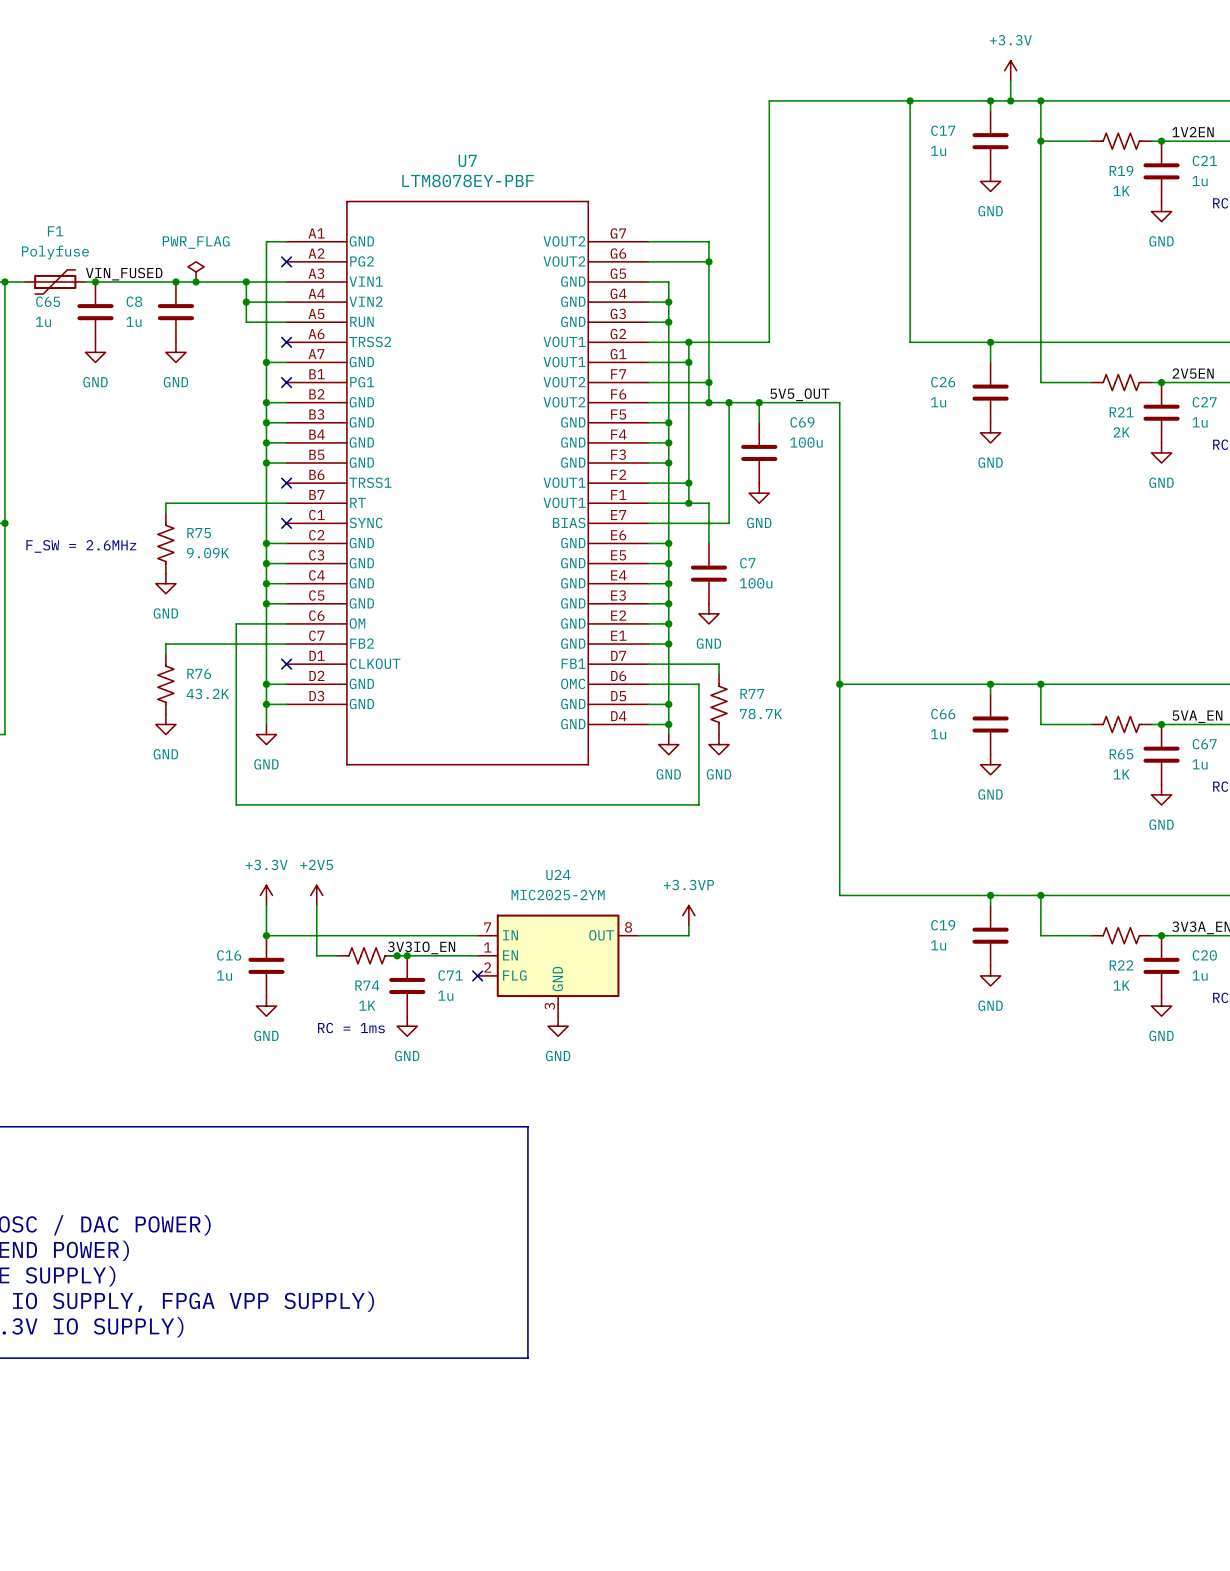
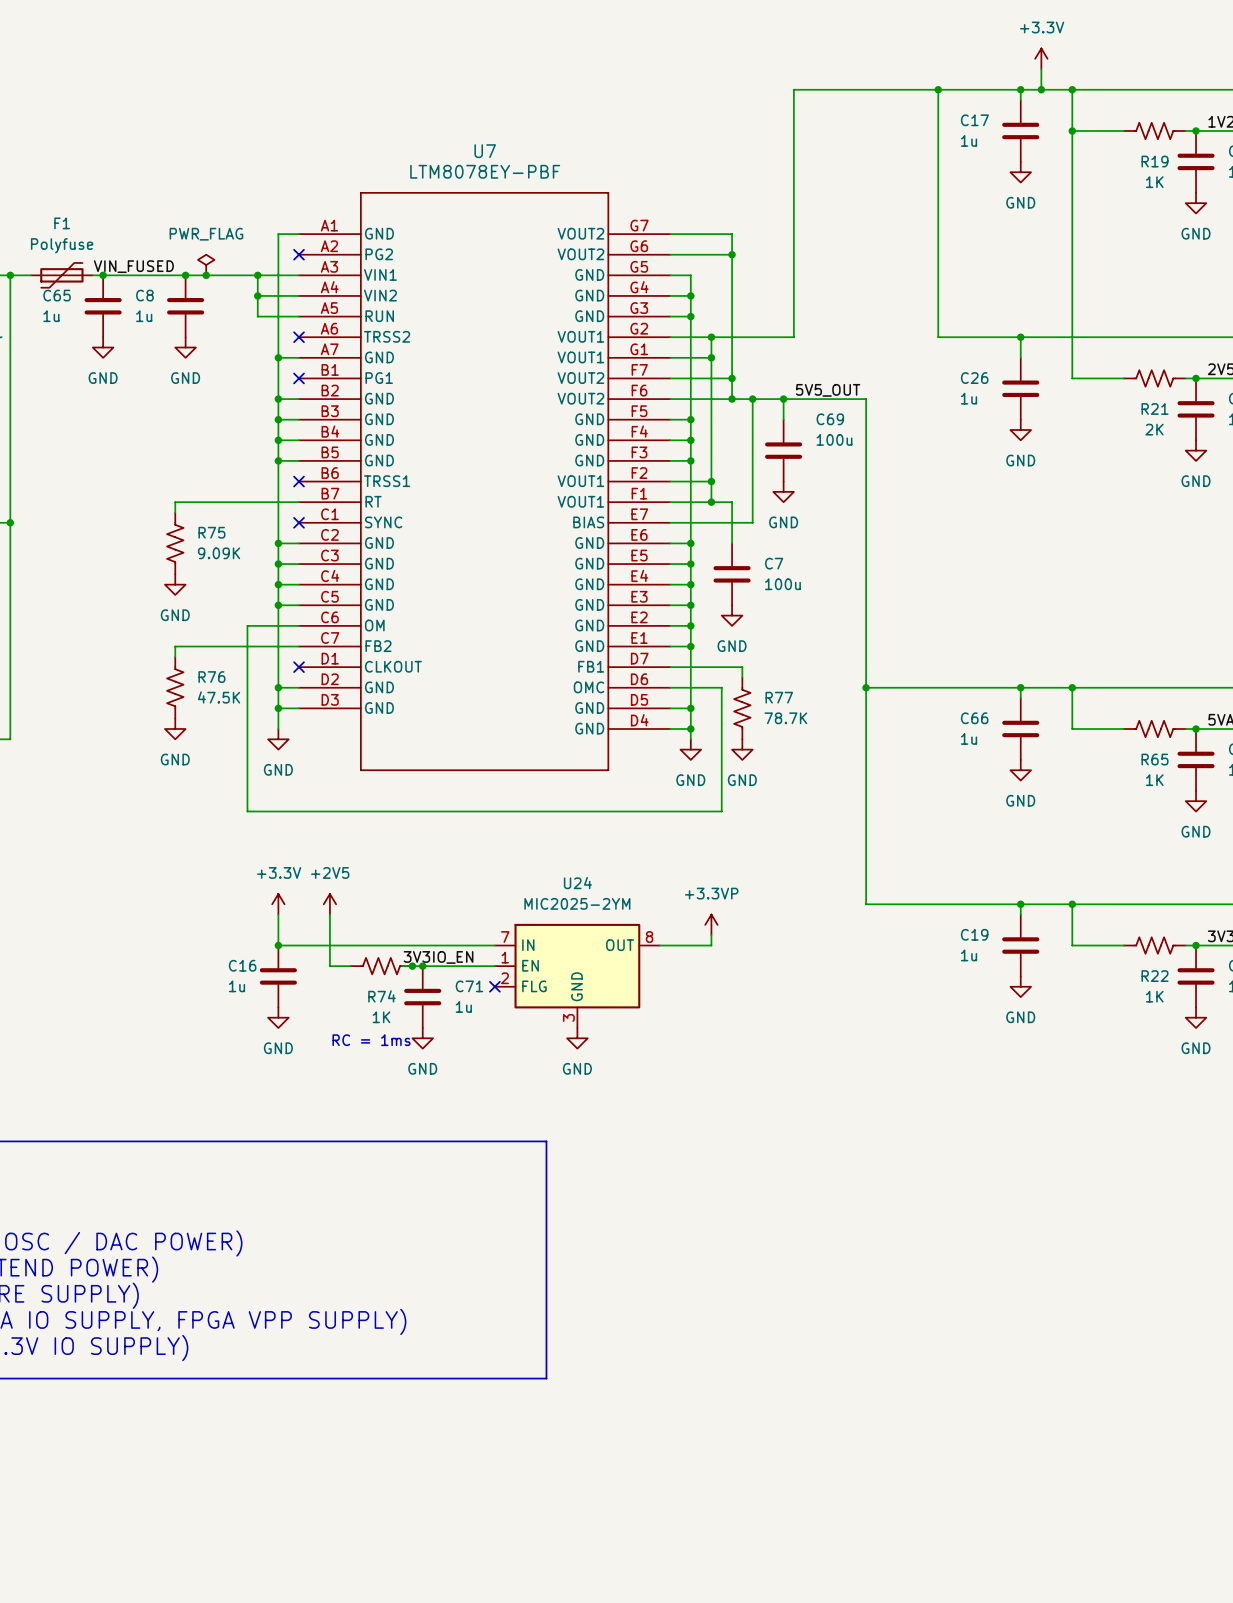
text: F_SW = 2.6MHz (81, 546) -> none
R76 value: 43.2K (207, 693) -> 47.5K (219, 697)

